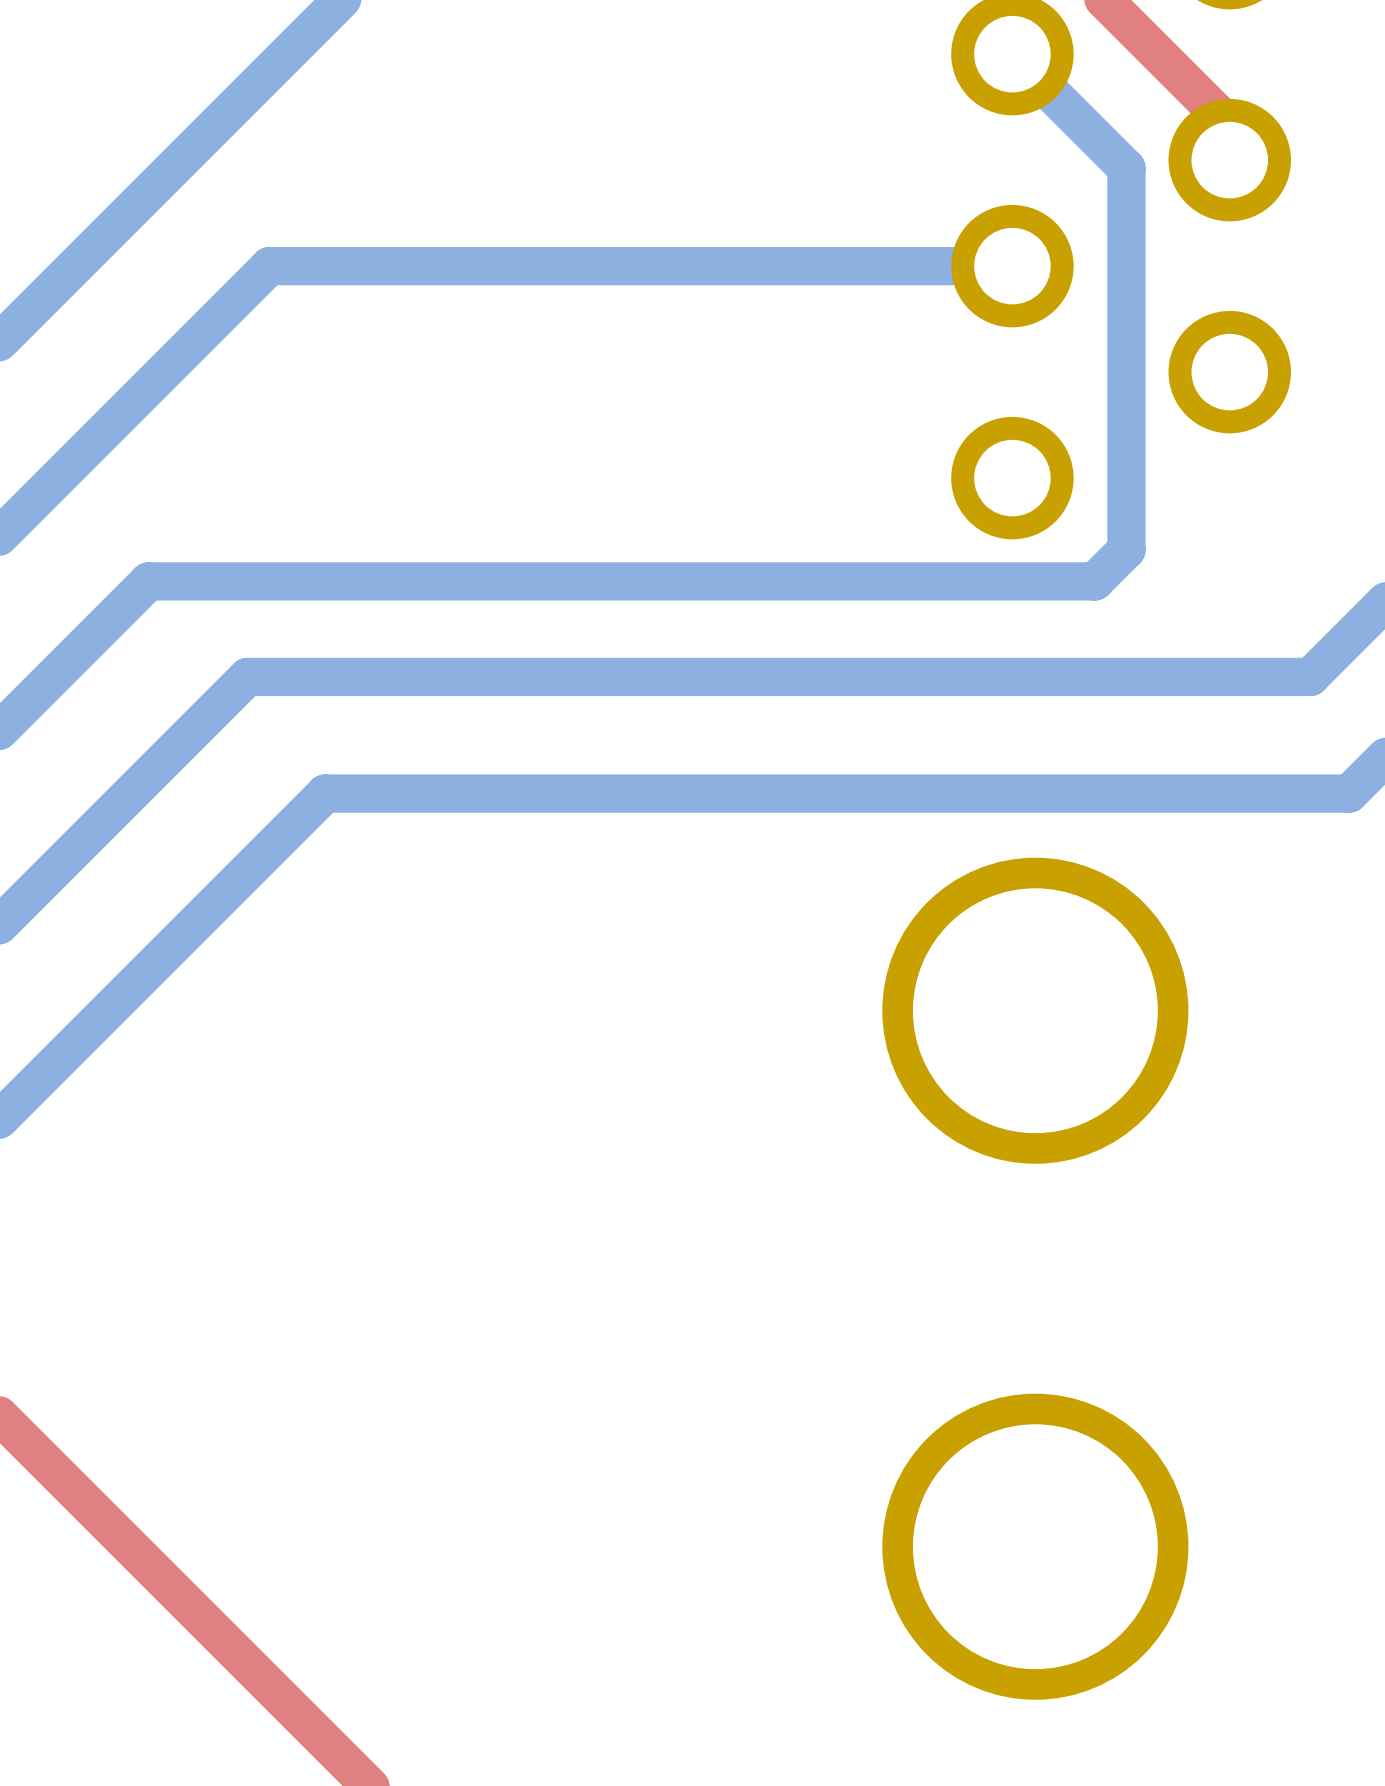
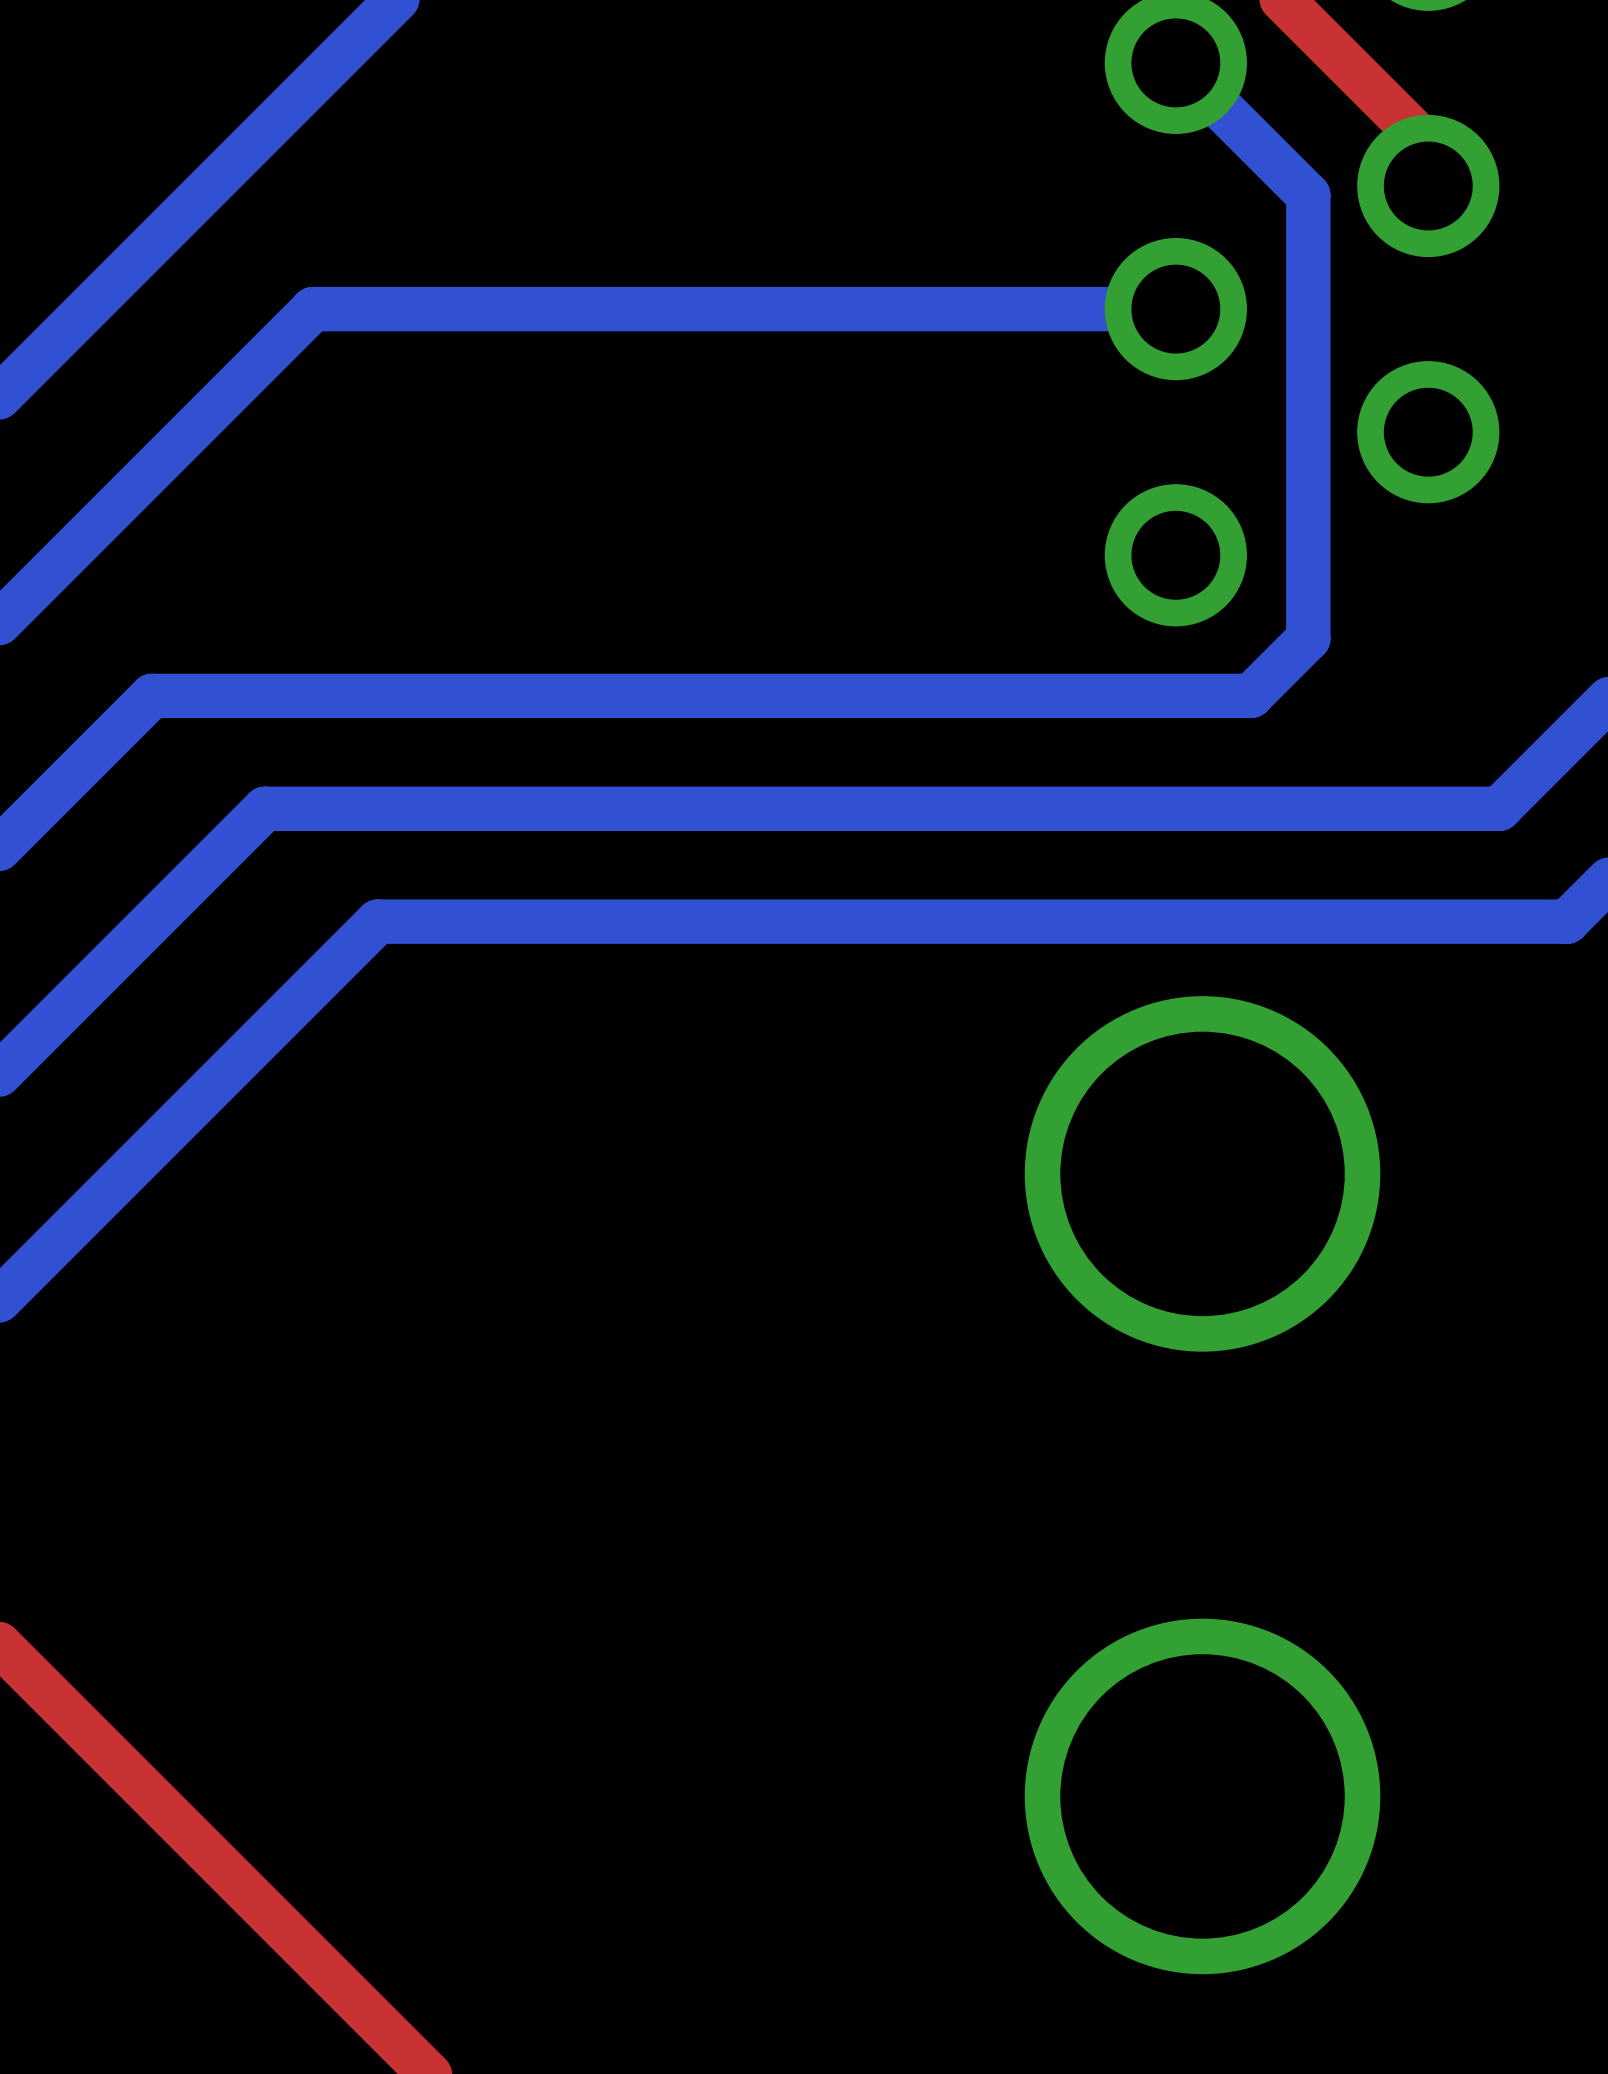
bottom track: (1094, 581) (148, 581) (130, 599) -> (1271, 675) (1250, 695) (152, 695)
bottom track: (1310, 676) (247, 676) (228, 696) -> (1521, 786) (1499, 808) (264, 808)

